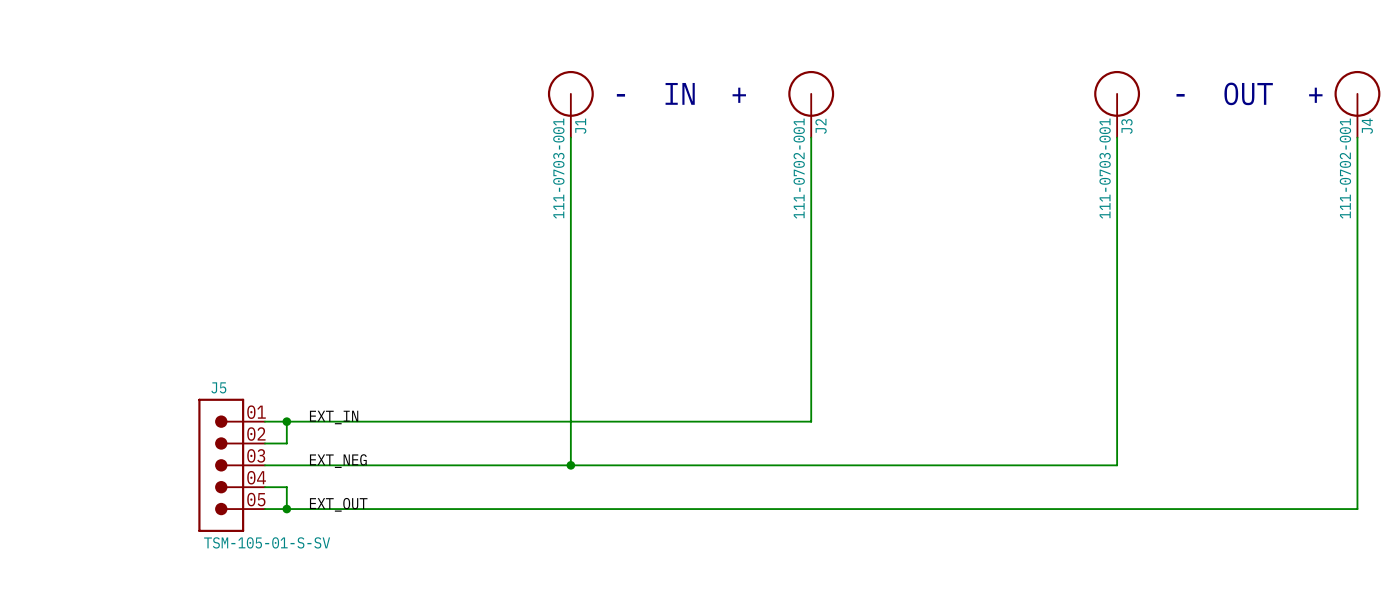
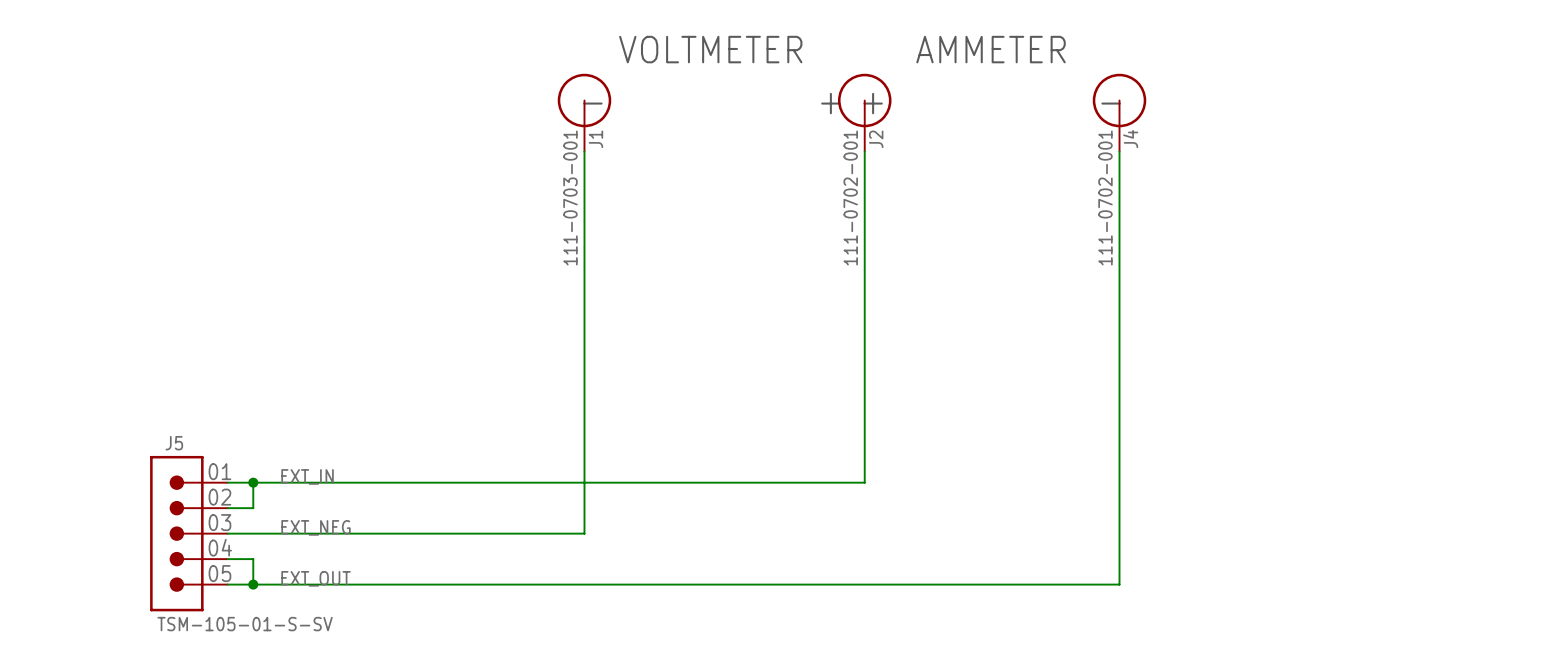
text: none -> VOLTMETER (710, 49)
text: none -> AMMETER (991, 49)
text: - IN + (681, 93) -> - + (711, 103)
text: - OUT + (1249, 93) -> none
text: none -> + - (992, 103)
J3: 111-0703-001 (1117, 104) -> none
J4 position: (1357, 104) -> (1119, 112)
wire: (1117, 137) (1117, 465) (570, 465) -> none
wire: (1357, 137) (1357, 509) (1029, 509) -> (1119, 151) (1119, 584)
junction: (570, 465) -> none

